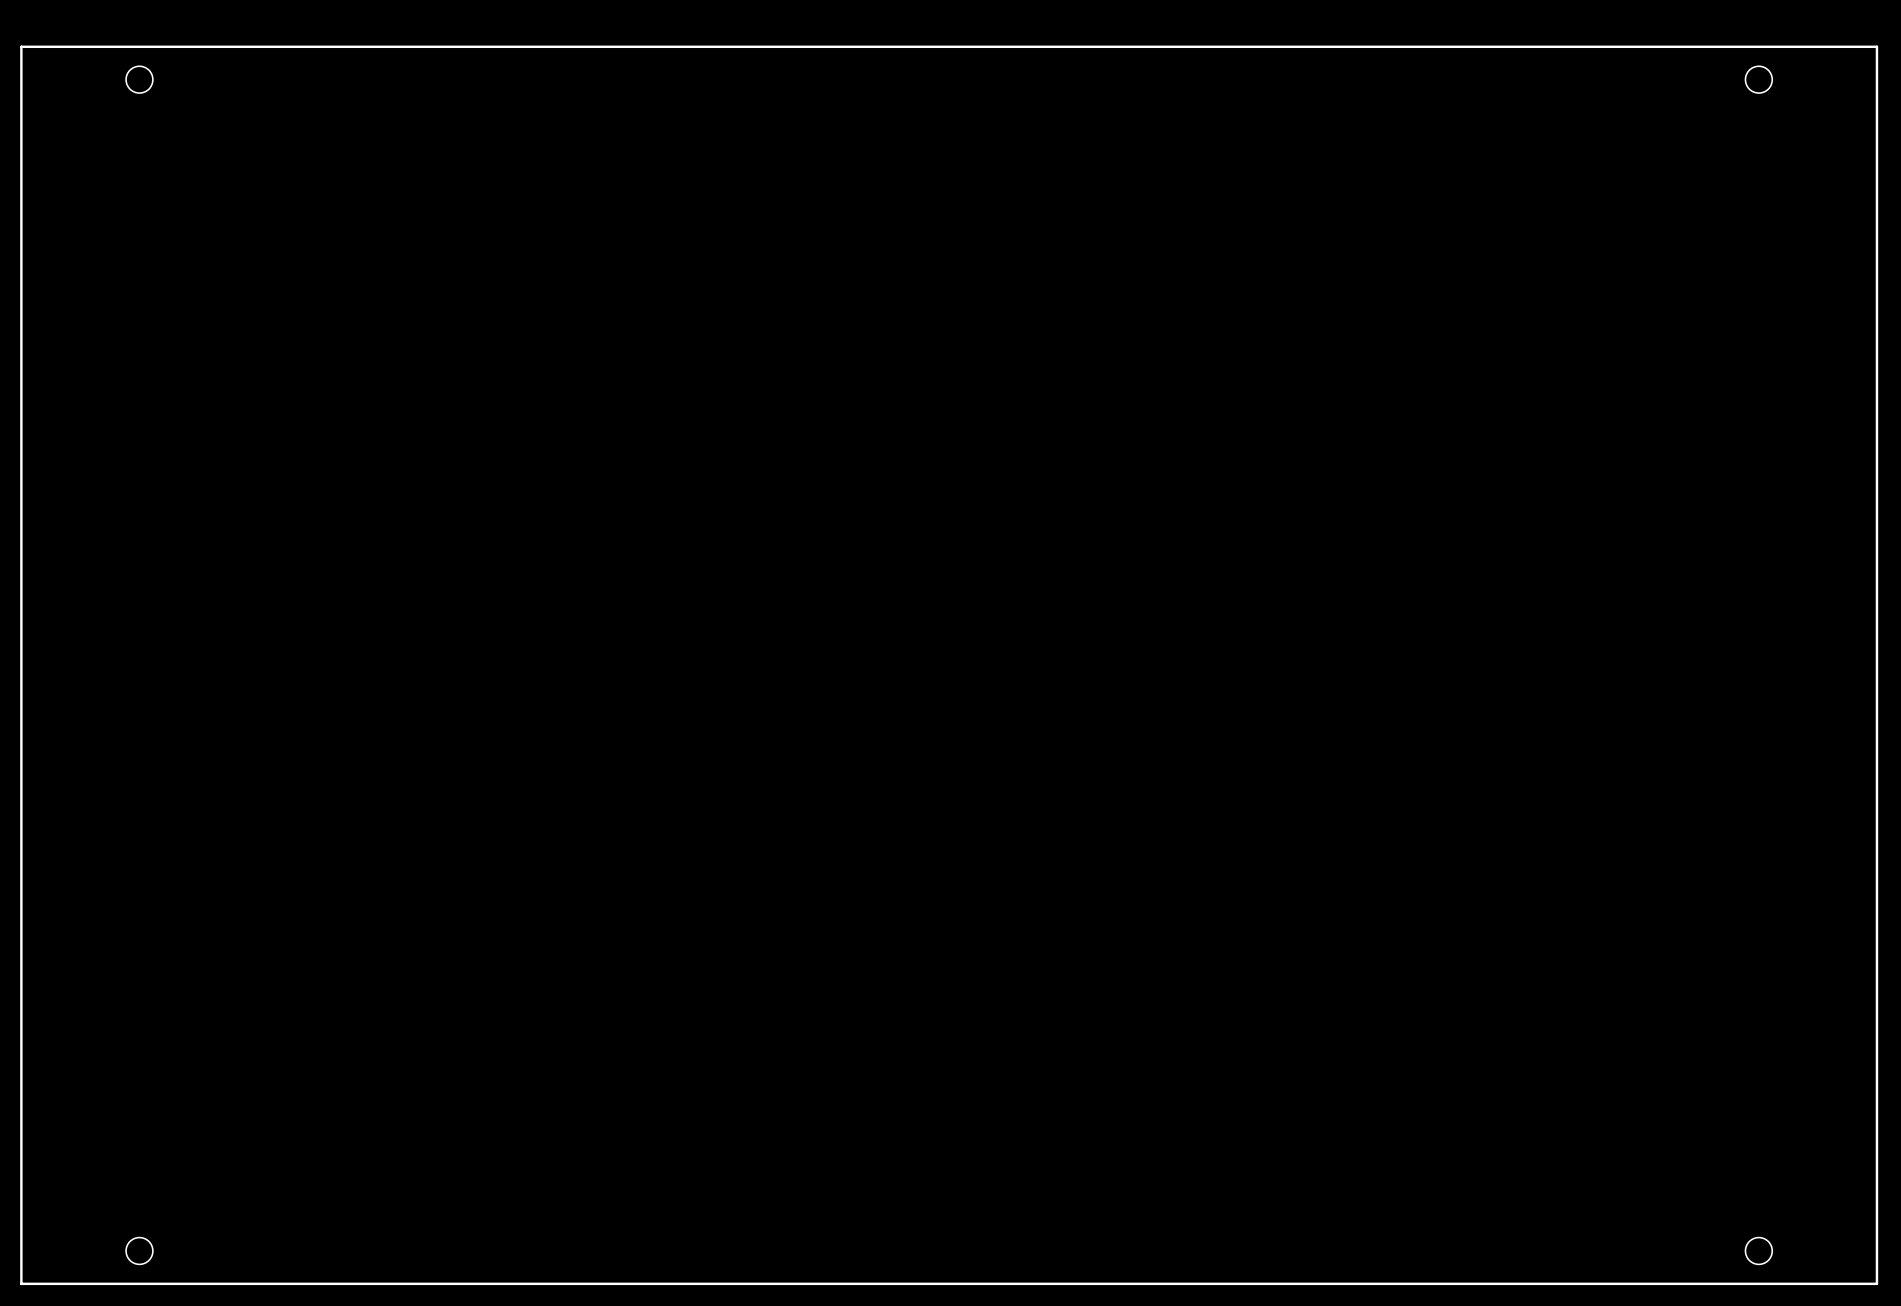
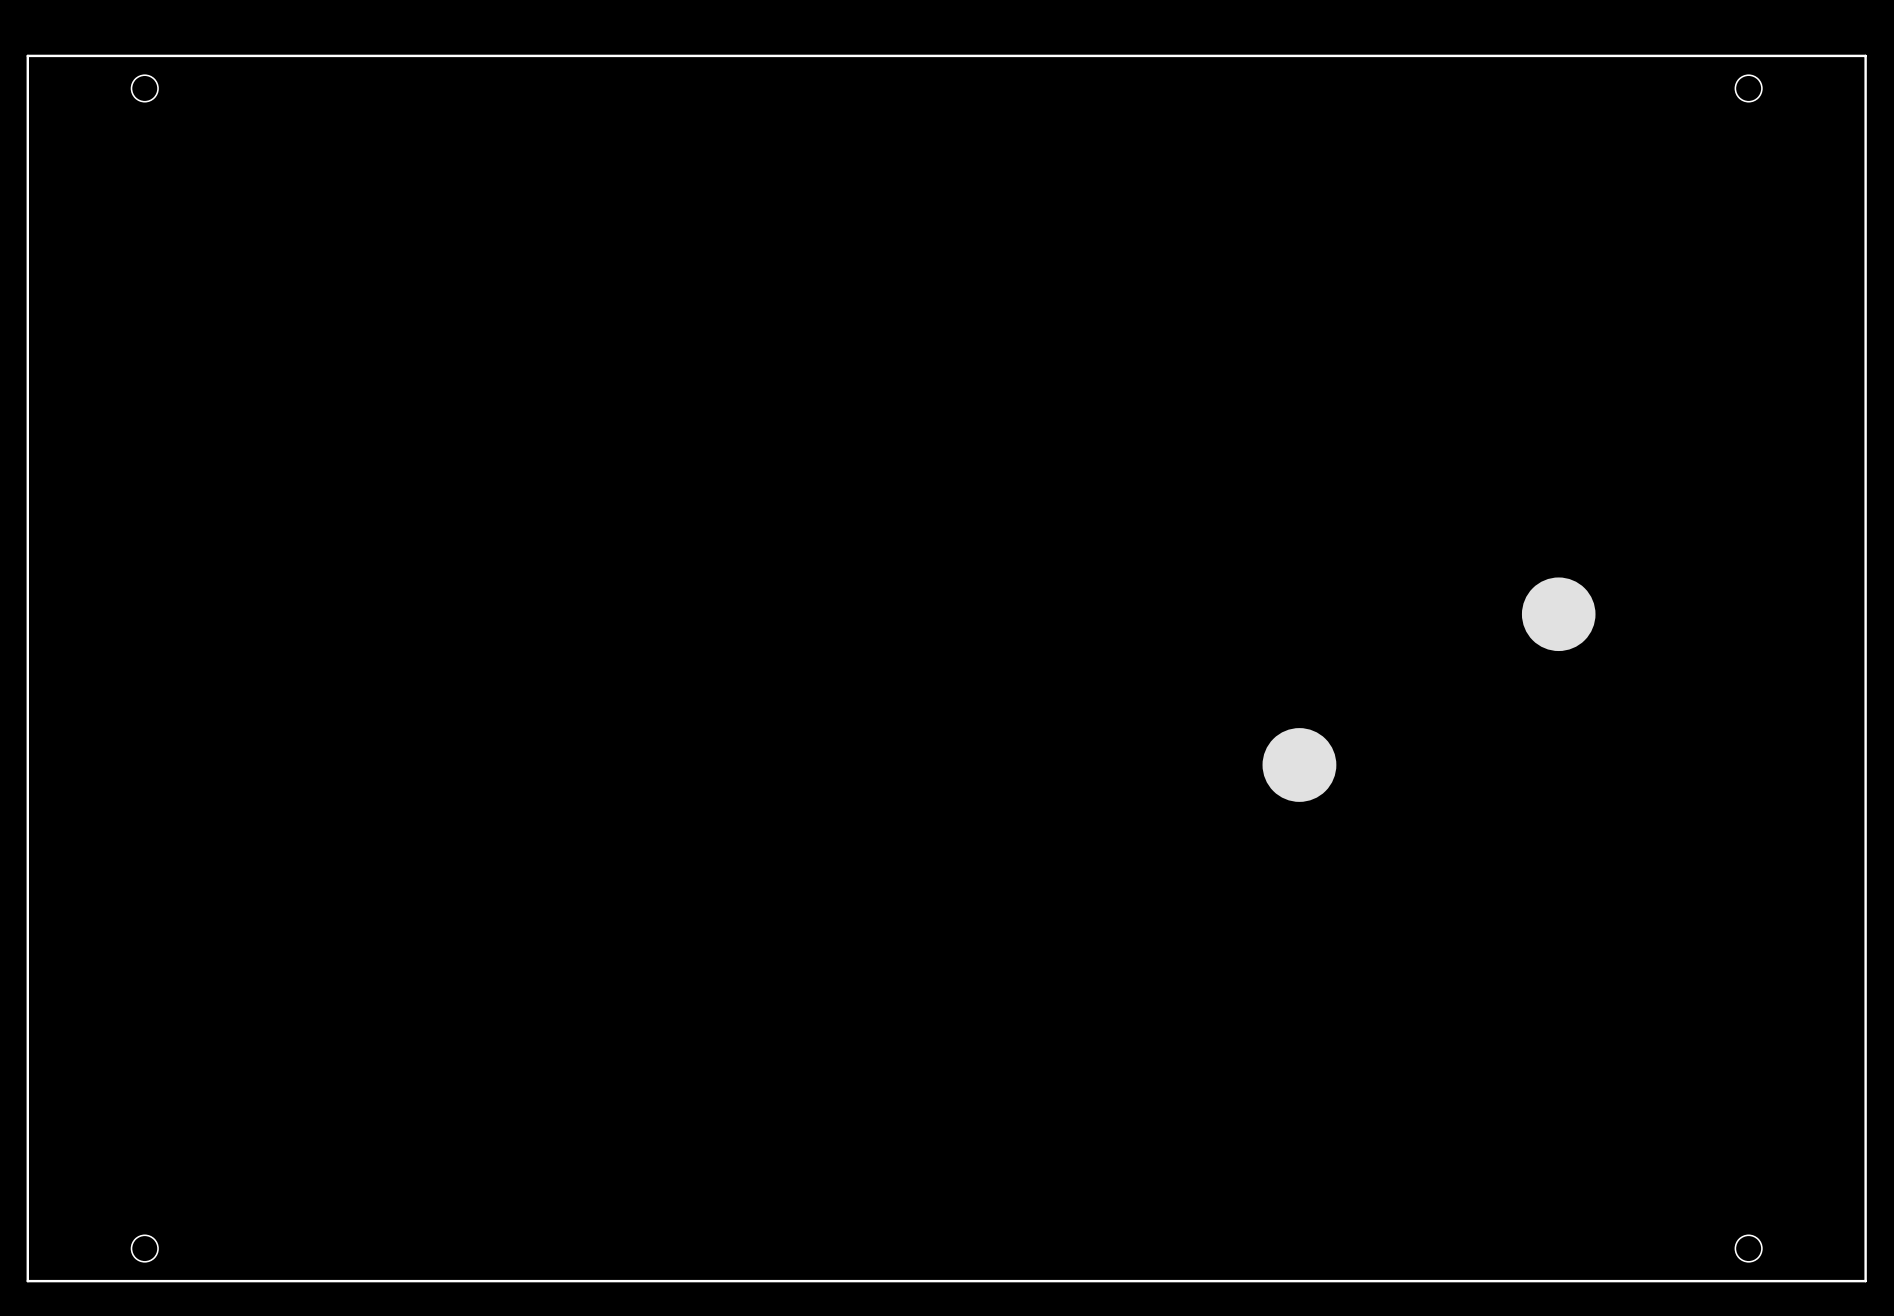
drawing: none -> [1521, 577, 1596, 652]
drawing: none -> [1262, 728, 1337, 802]

